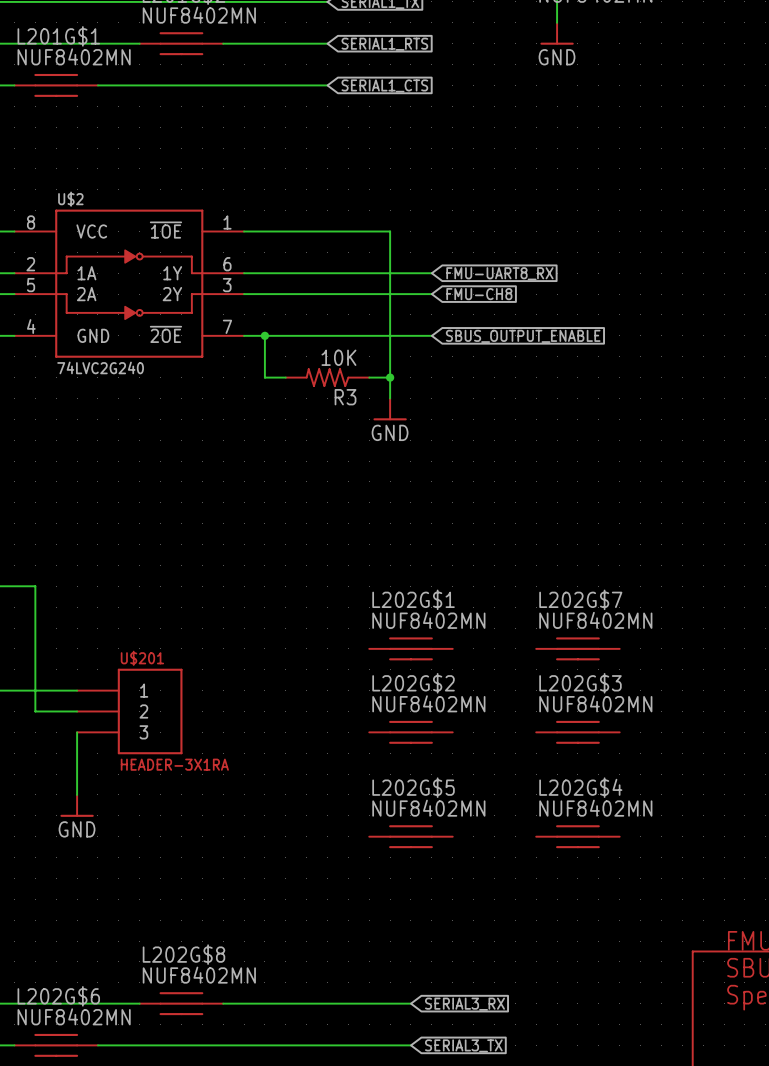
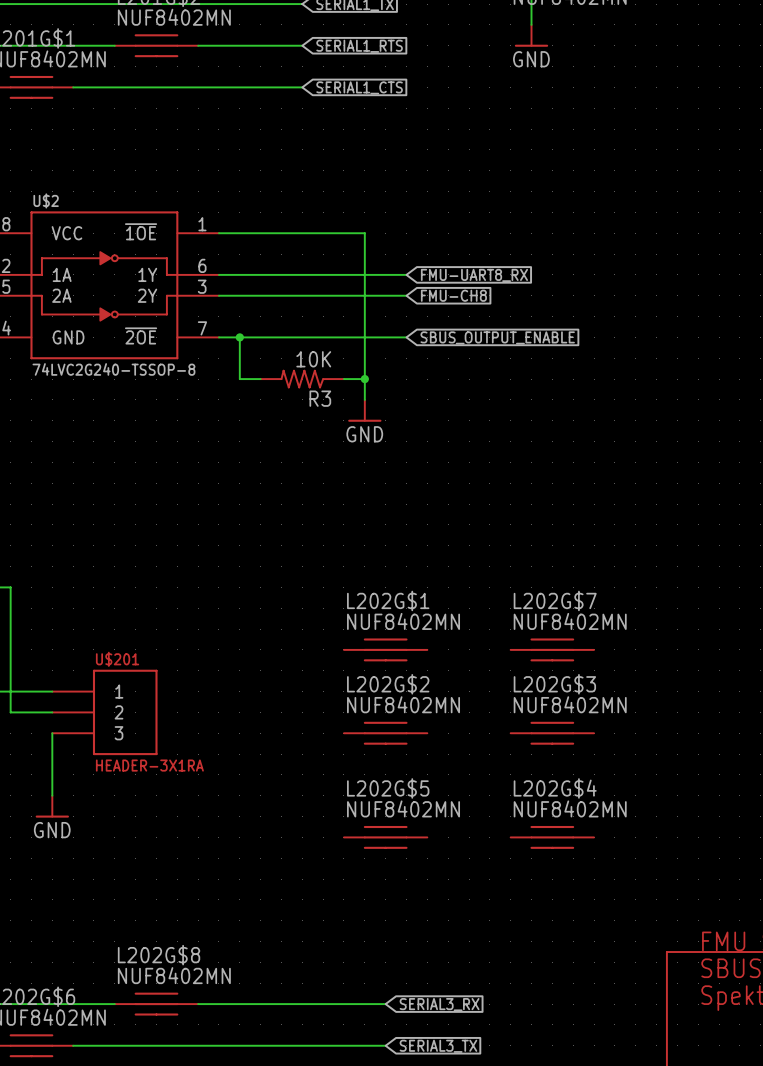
U$2 value: 74LVC2G240 (100, 367) -> 74LVC2G240-TSSOP-8 (113, 369)

